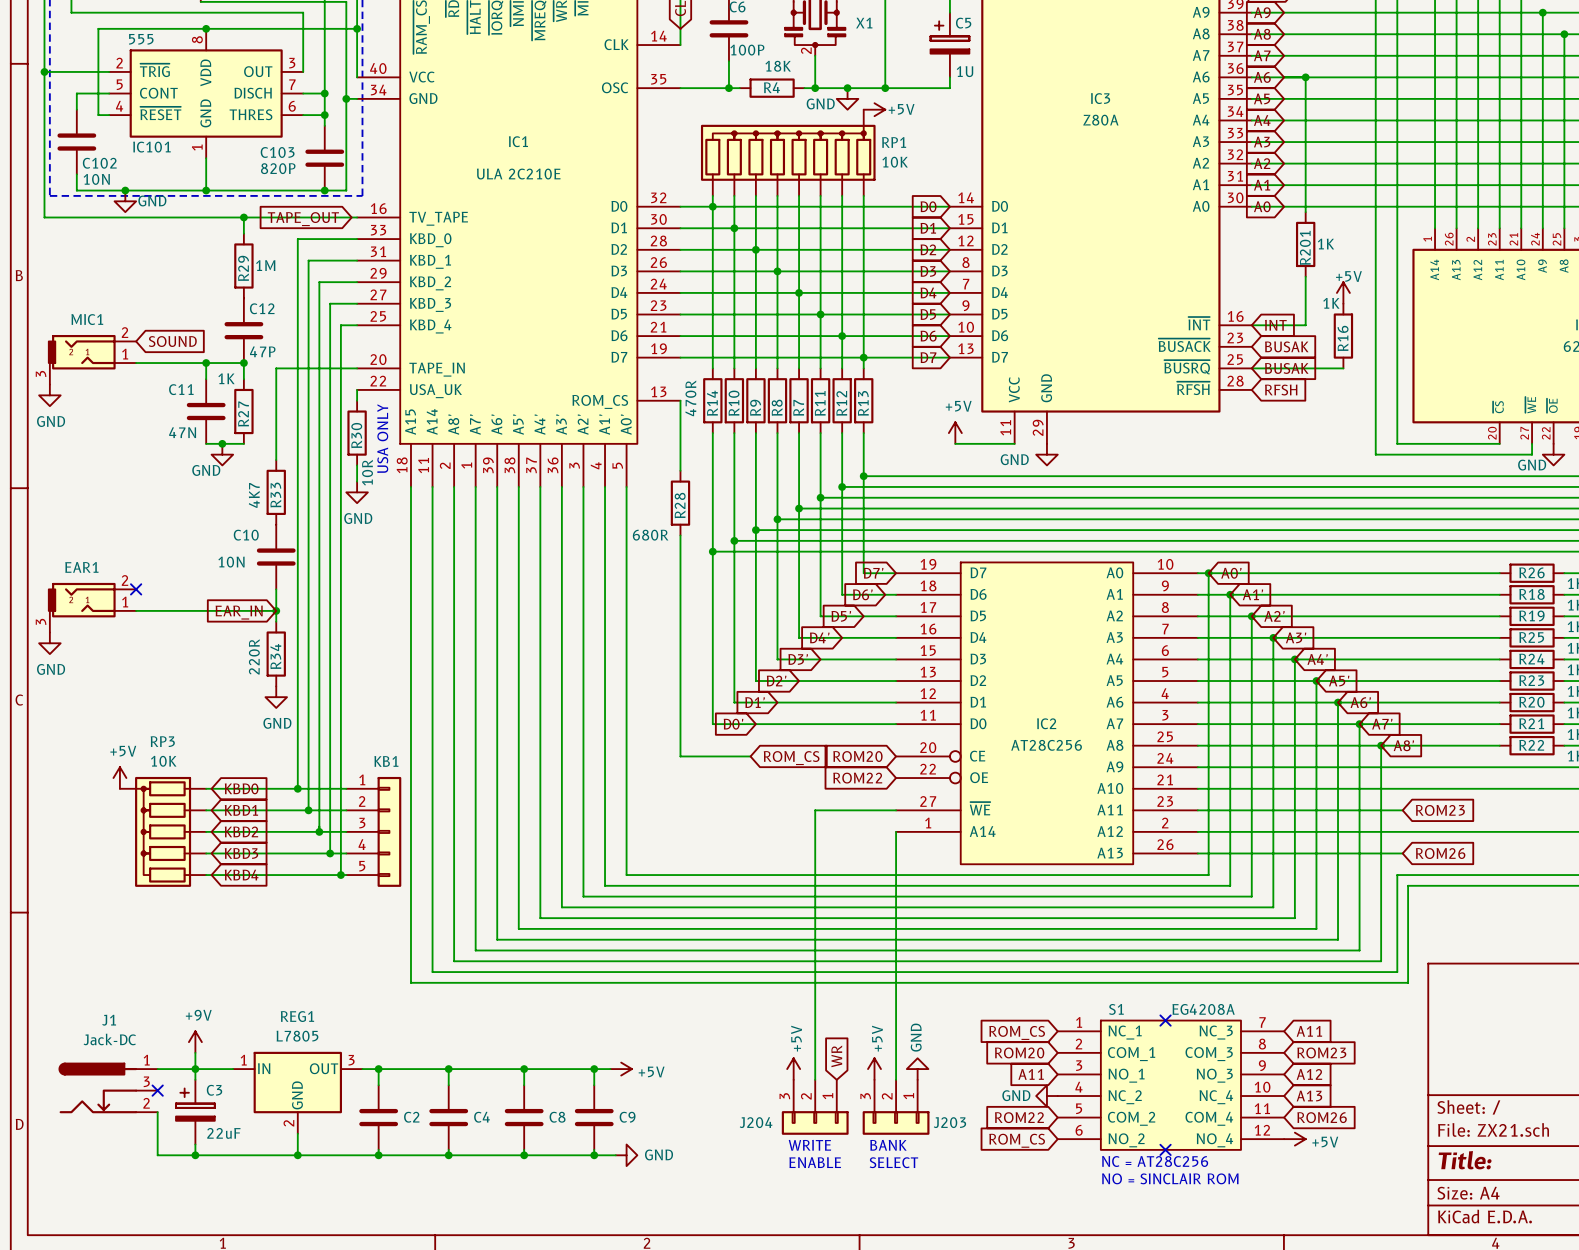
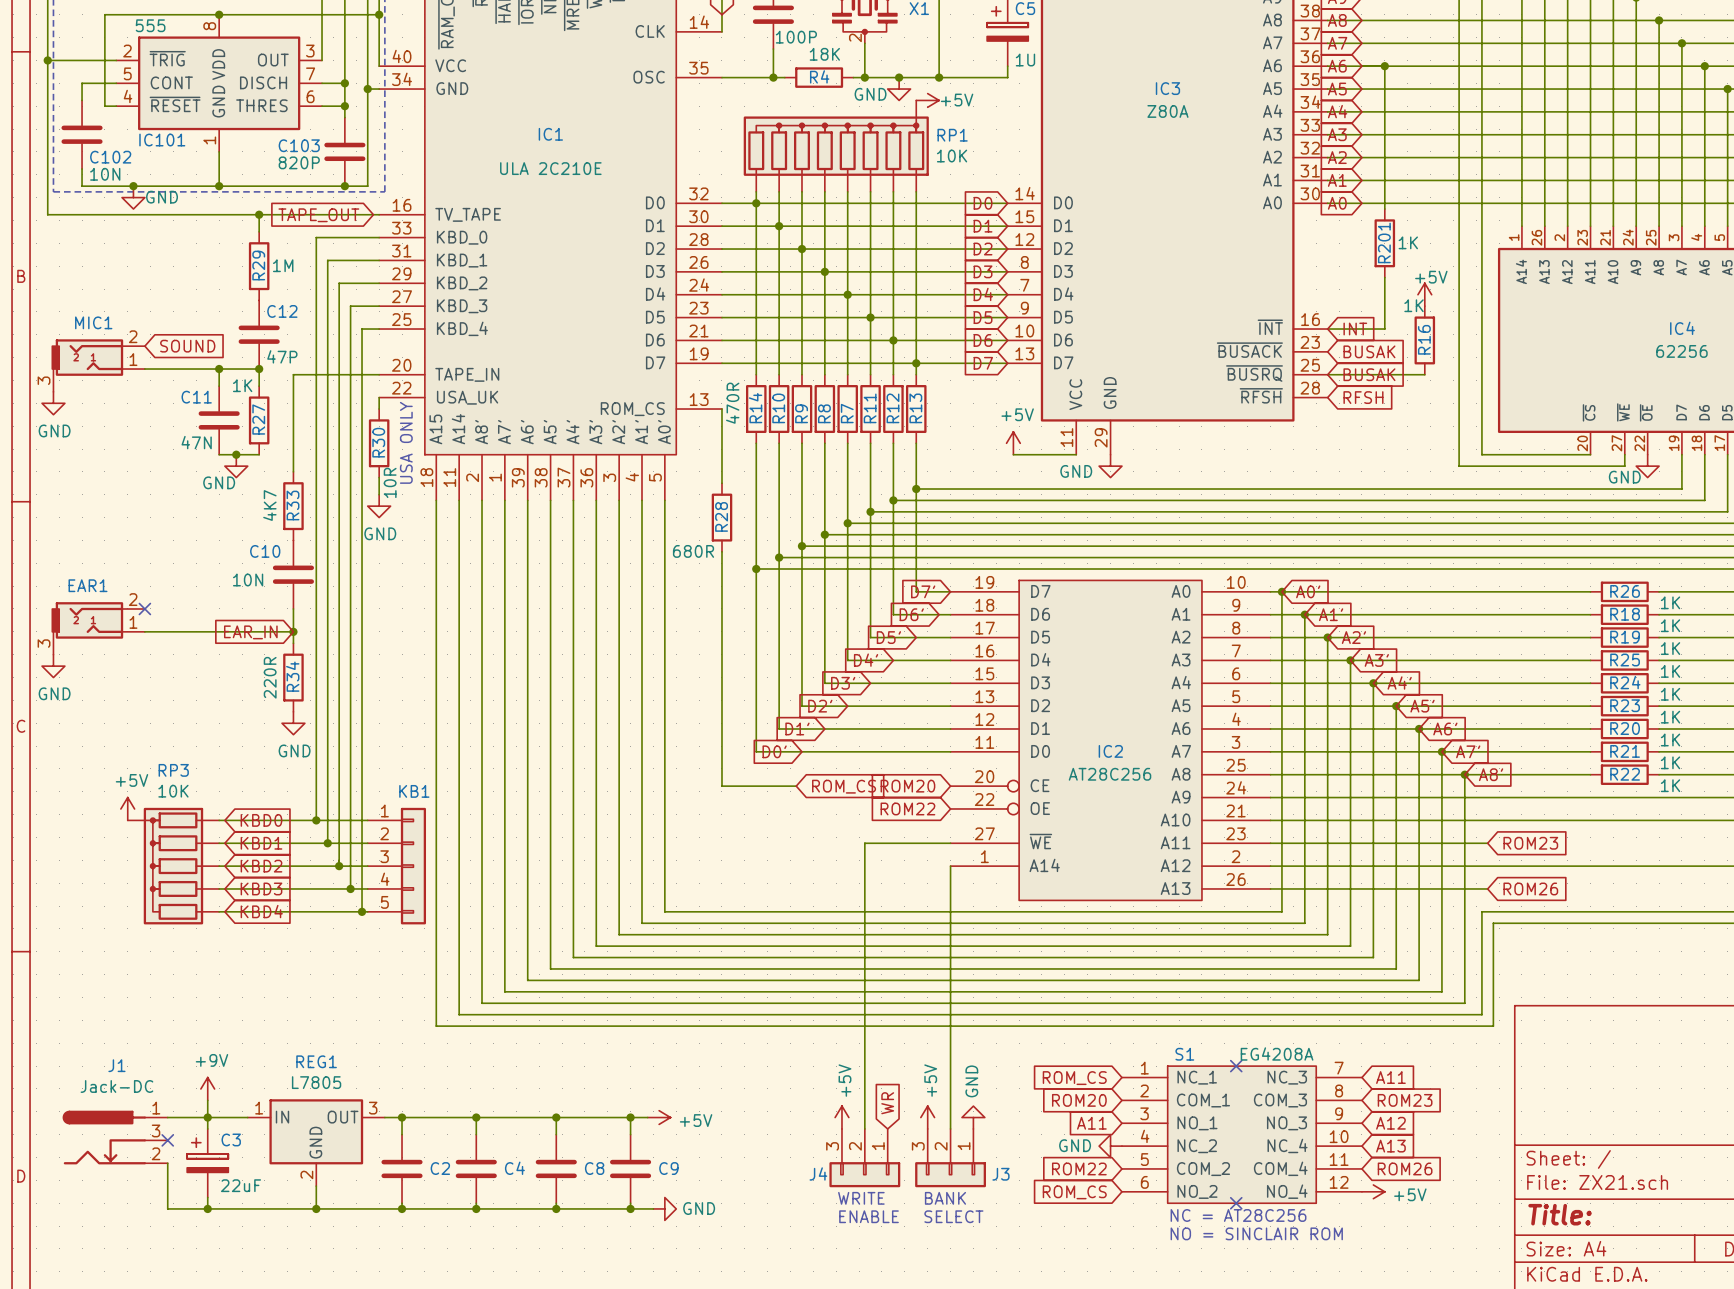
J204 name: J204 (756, 1122) -> J4 (818, 1173)
J203 name: J203 (949, 1122) -> J3 (1000, 1174)

